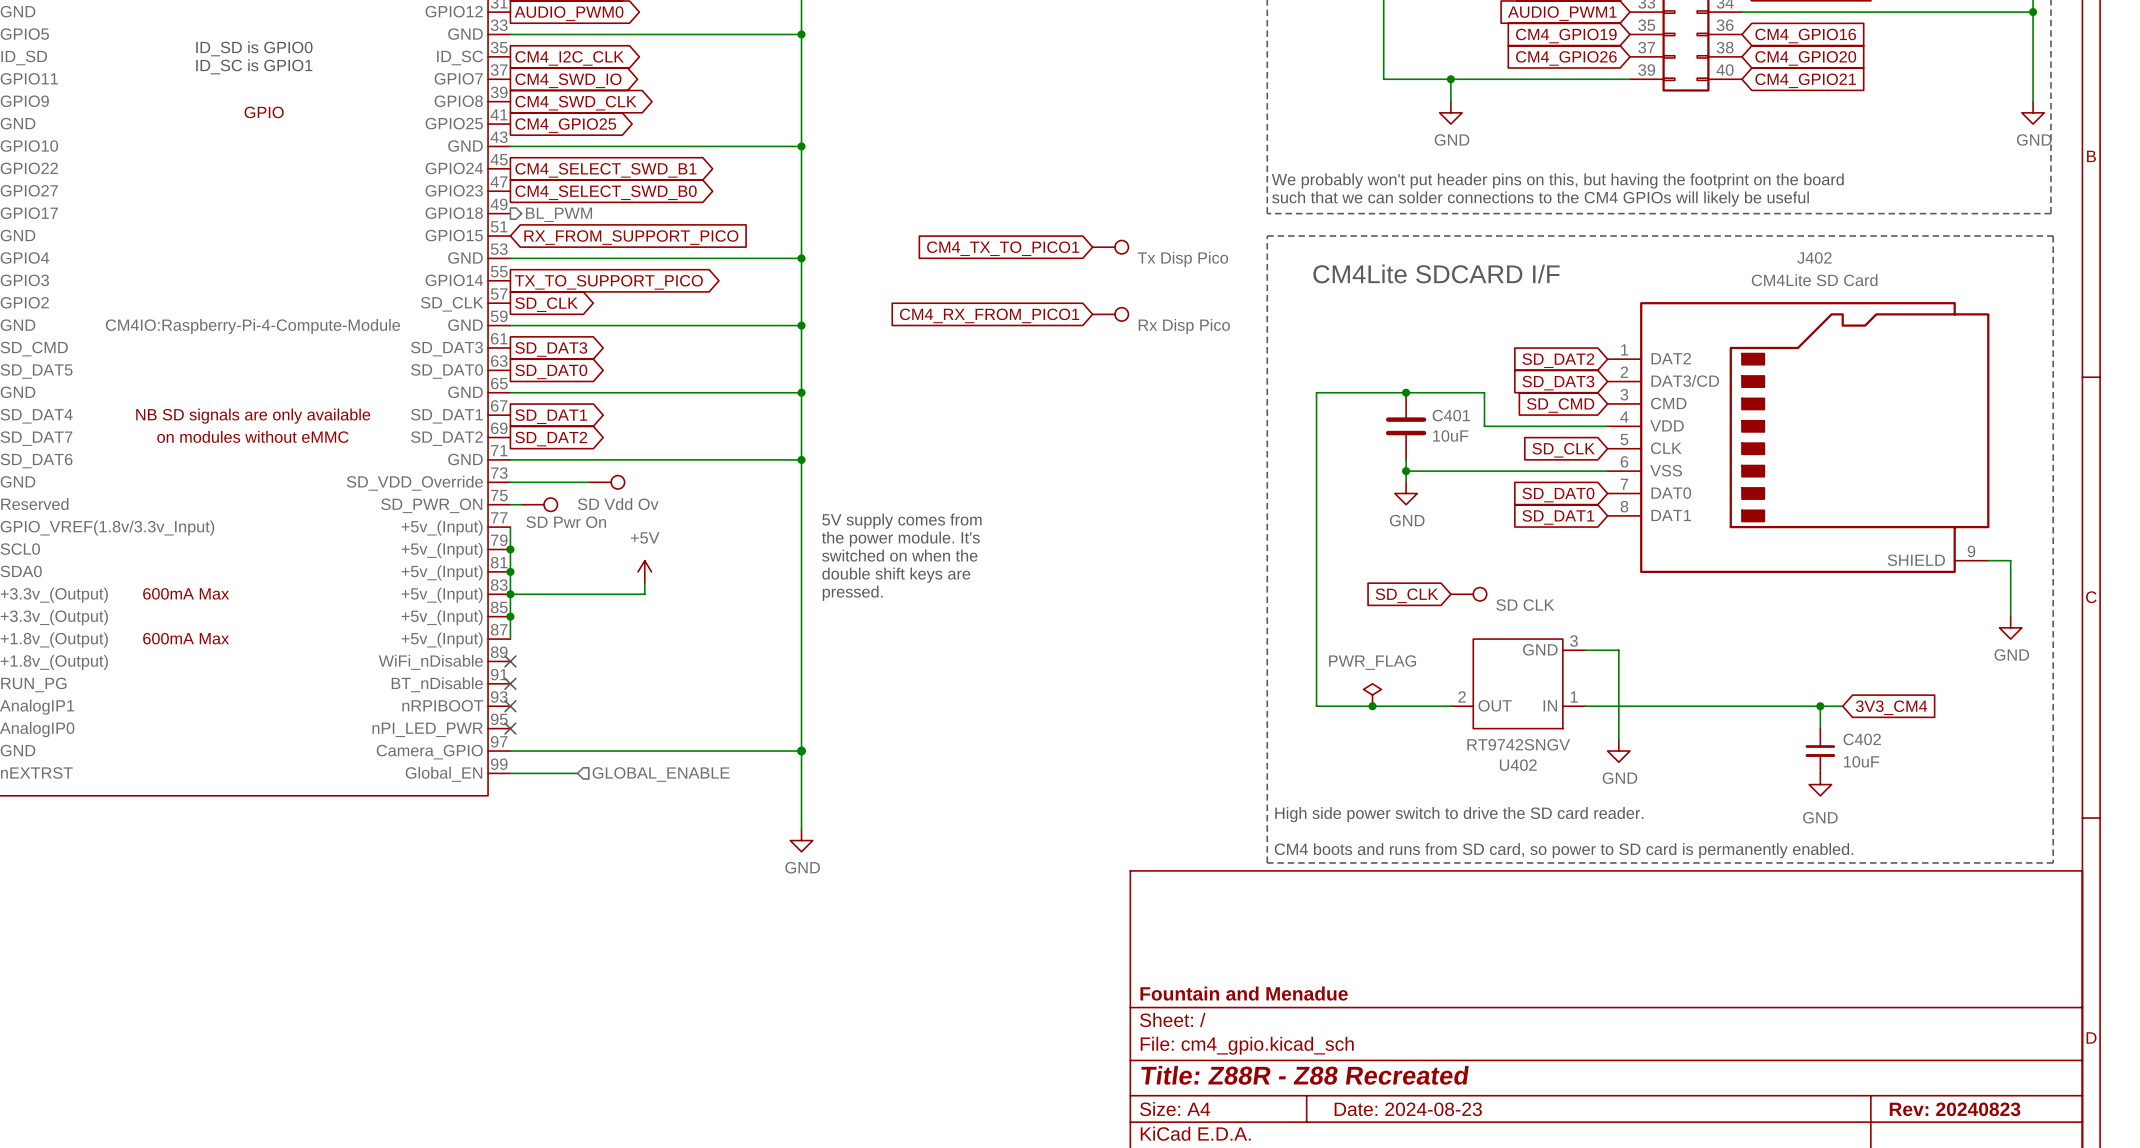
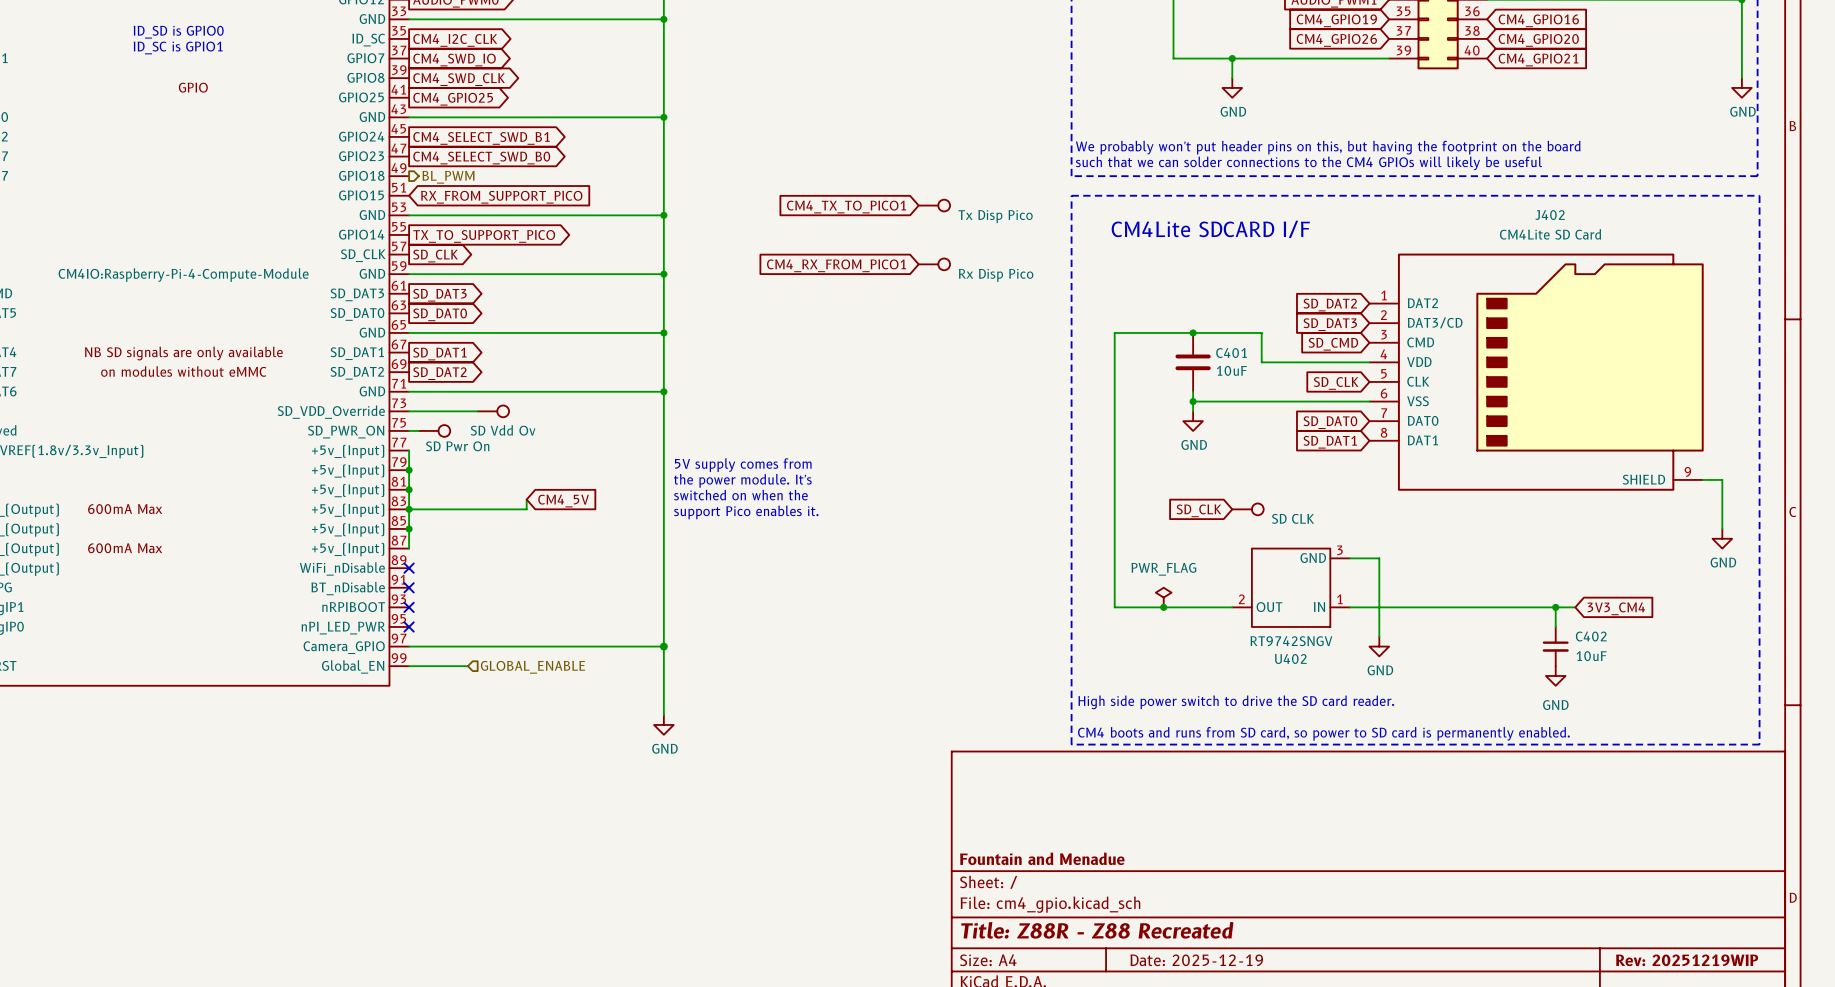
text position: 5V supply comes from (901, 521) -> 5V supply comes from (743, 465)
text position: the power module. It's (900, 539) -> the power module. It's (742, 480)
text position: switched on when the (899, 555) -> switched on when the (740, 495)
power symbol: +5V (644, 571) -> none
text: double shift keys are (896, 575) -> none
global label: none -> CM4_5V (563, 501)
text: pressed. (852, 593) -> none
text: none -> support Pico enables it. (746, 512)
title block: Date: 2024-08-23 (1408, 1109) -> Date: 2025-12-19 (1196, 960)
title block: Rev: 20240823 (1955, 1109) -> Rev: 20251219WIP (1687, 960)

